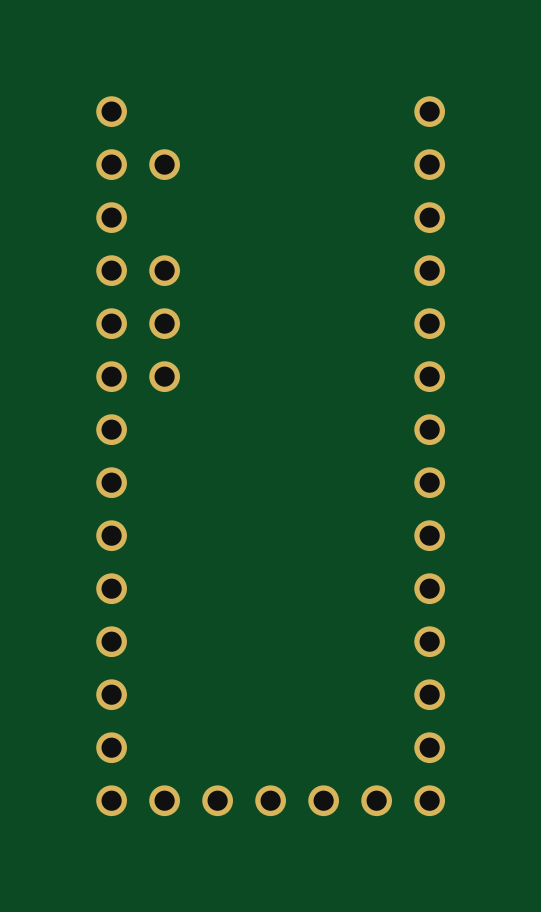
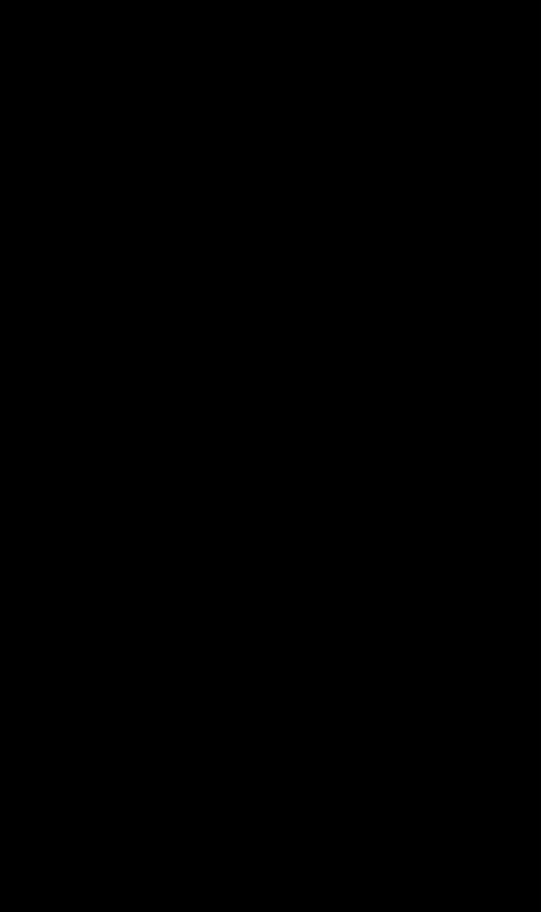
part: (270, 456) -> none

